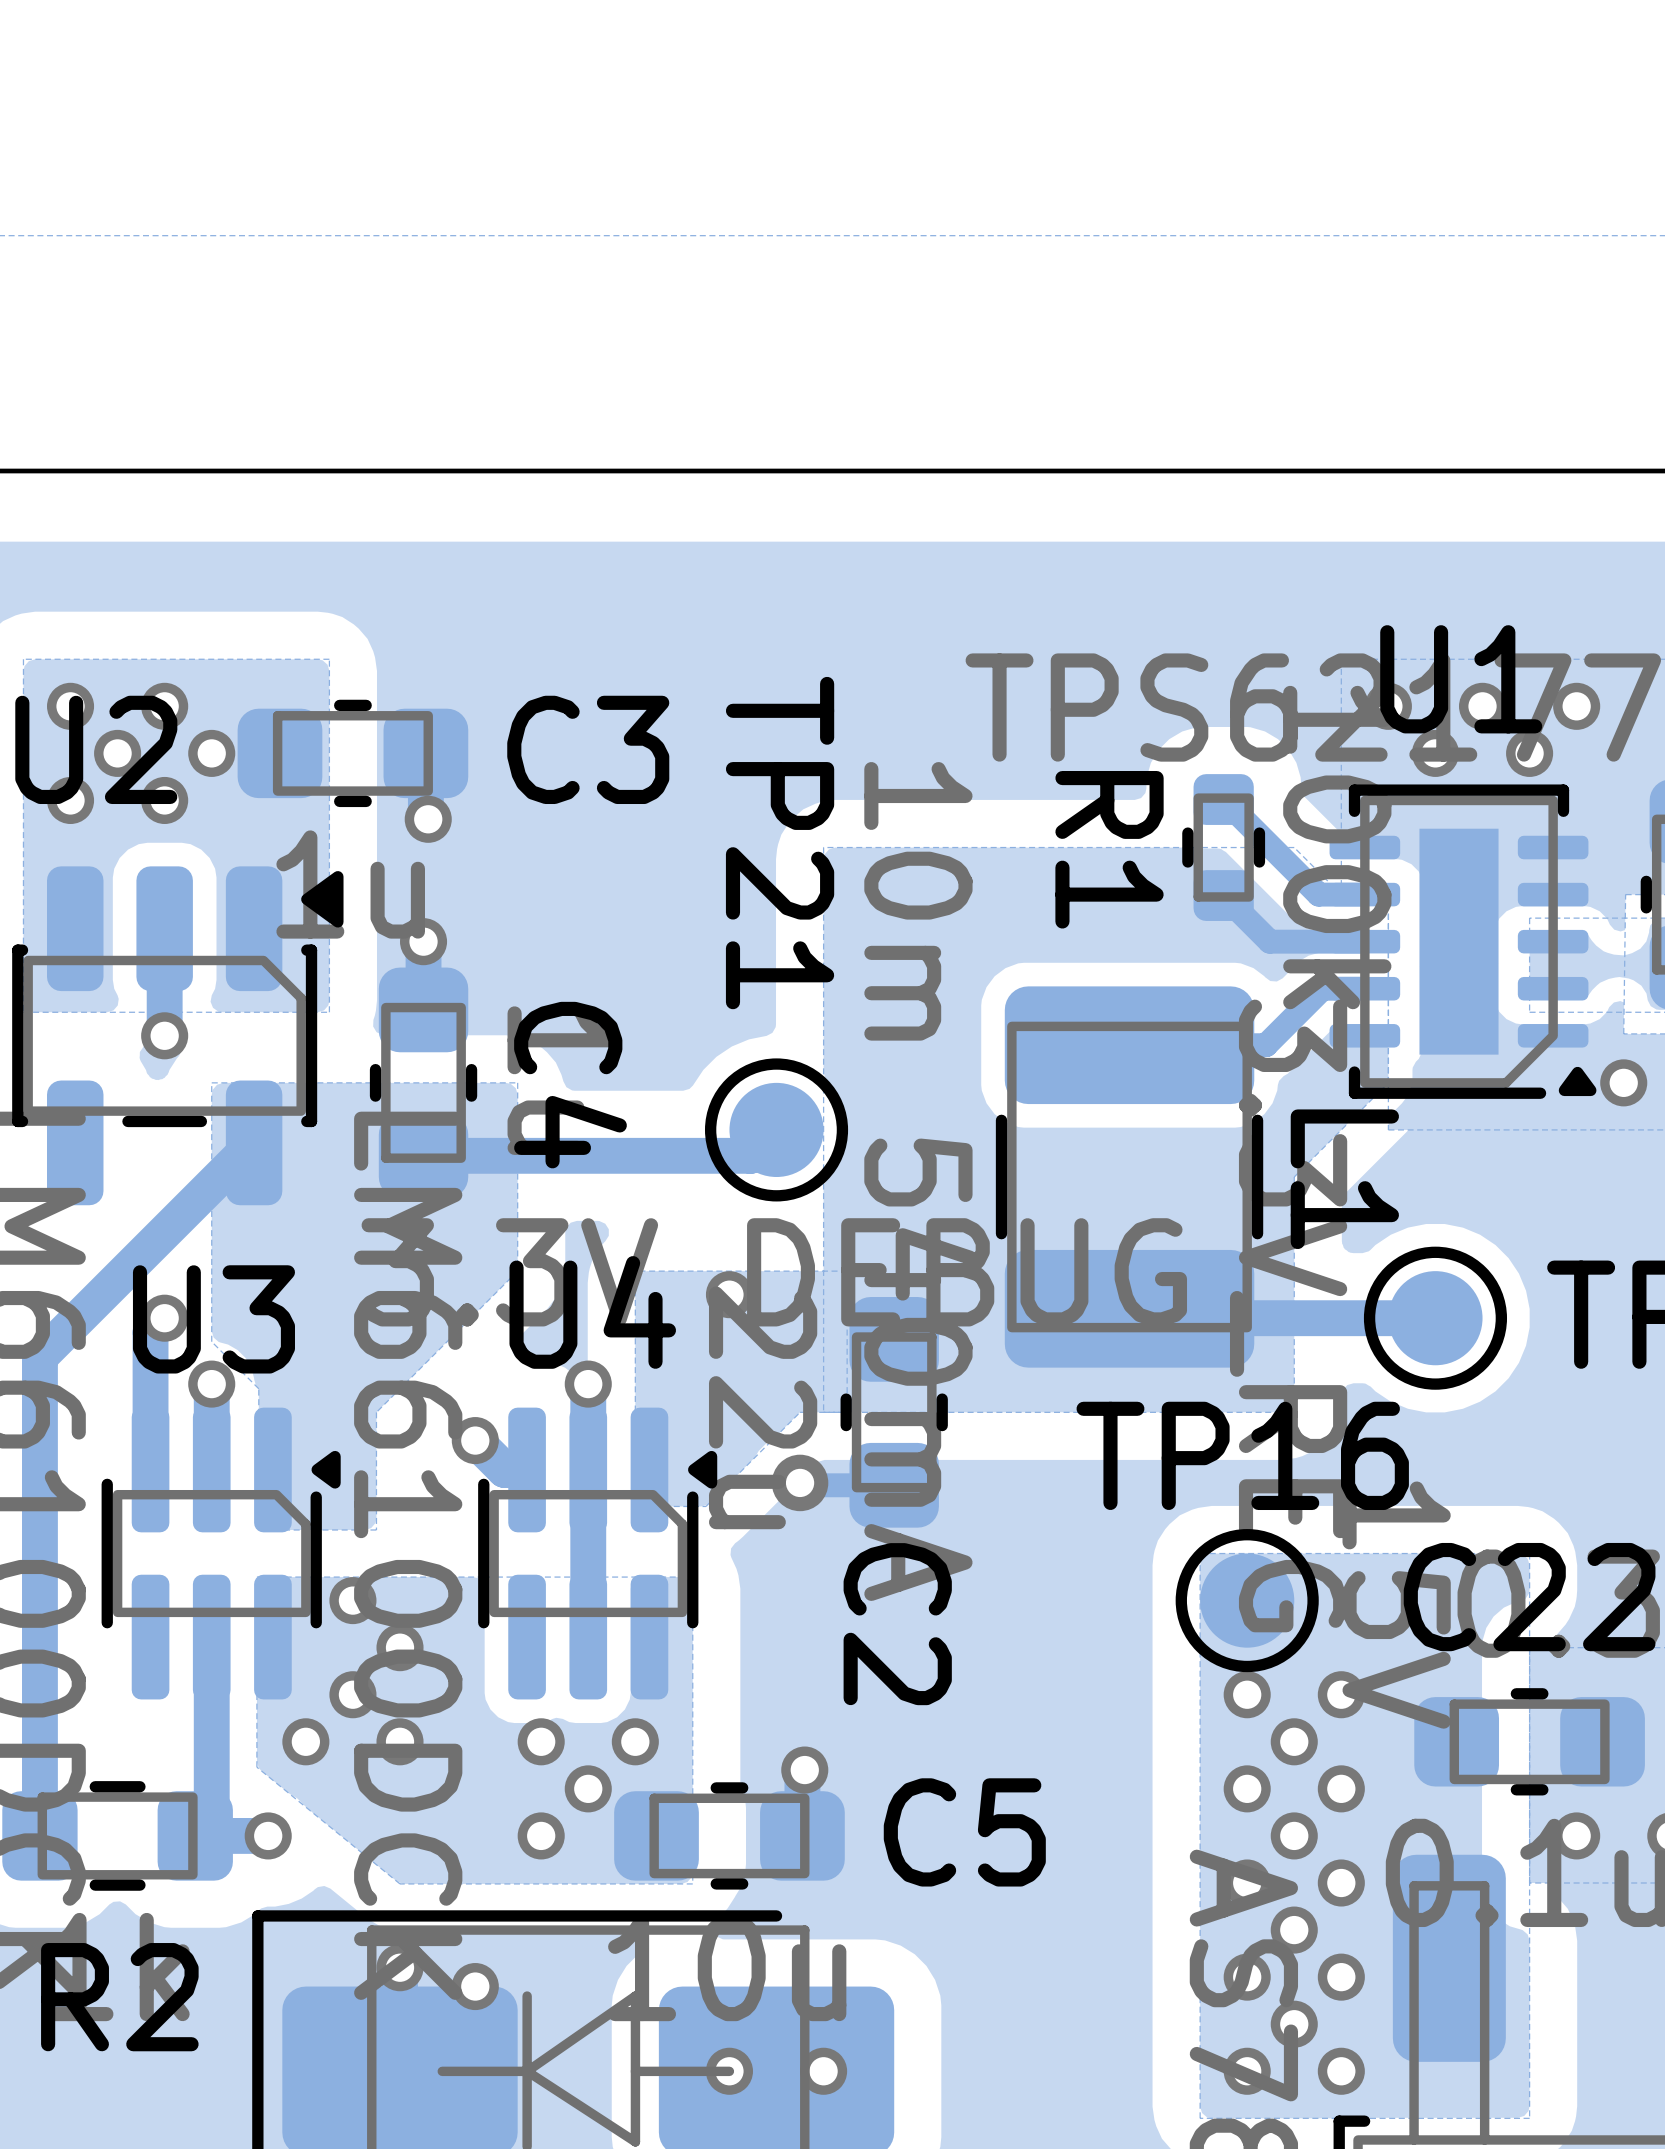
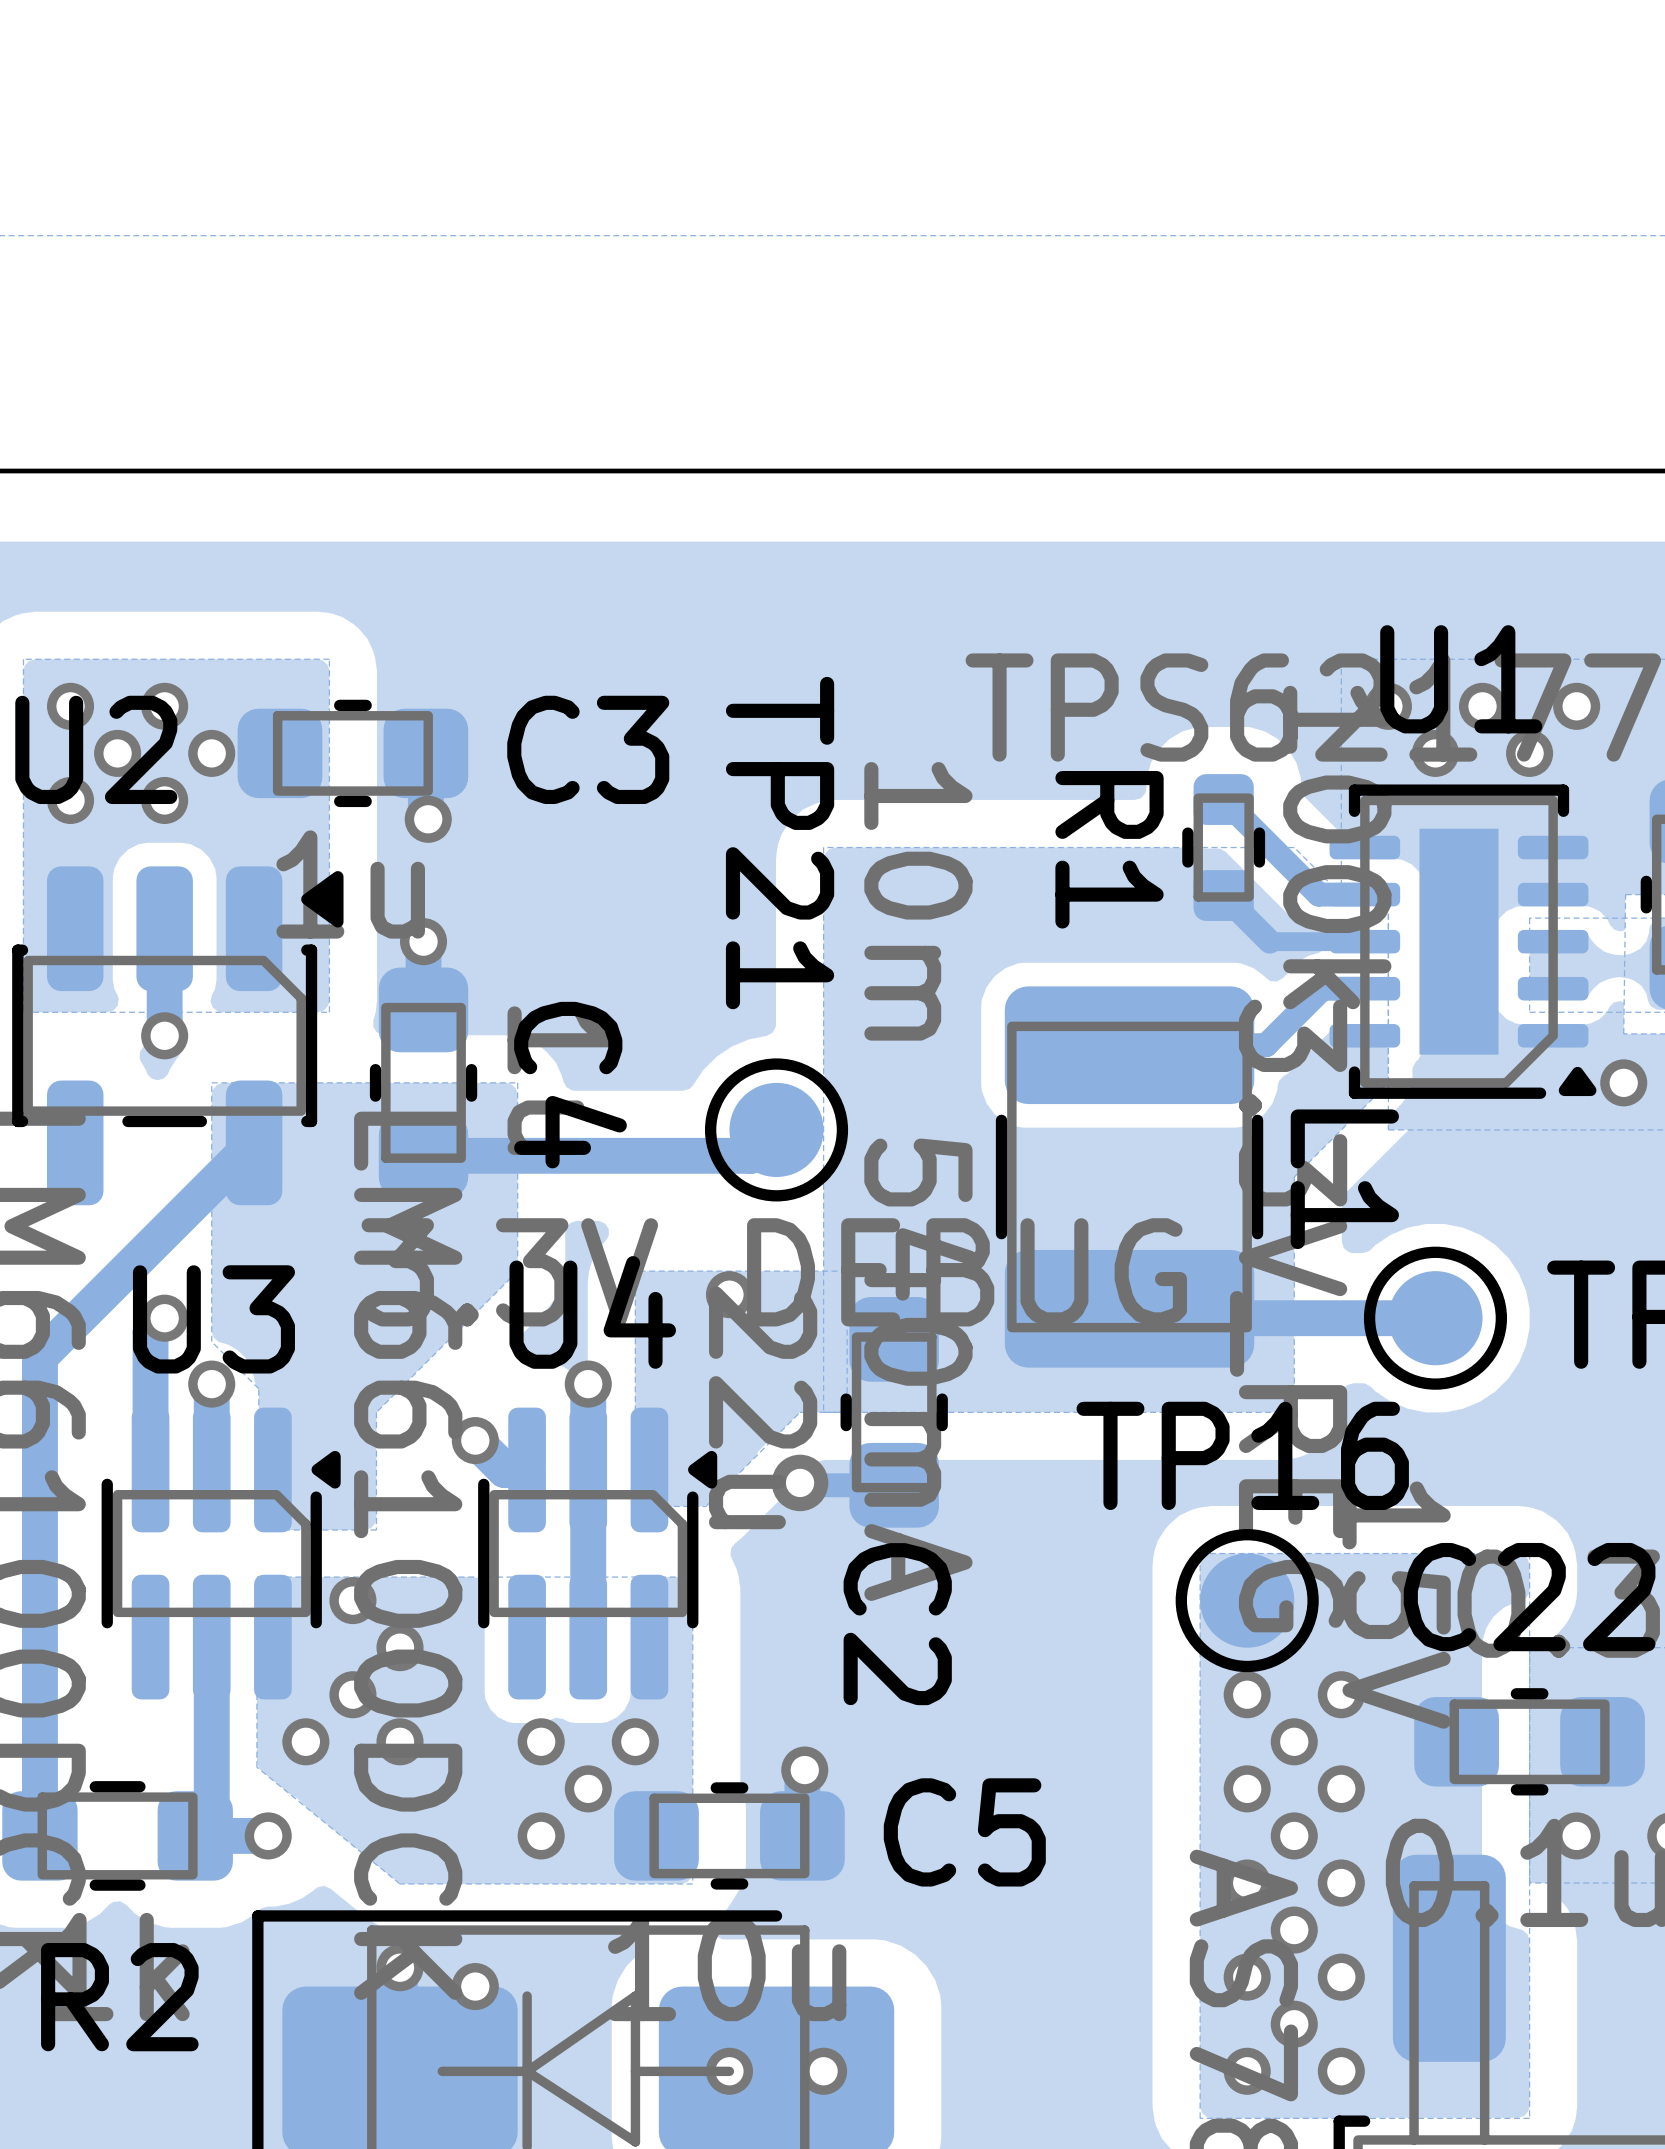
track width: thick (1364, 941) (1269, 941) -> thin (1364, 941) (1269, 941)

